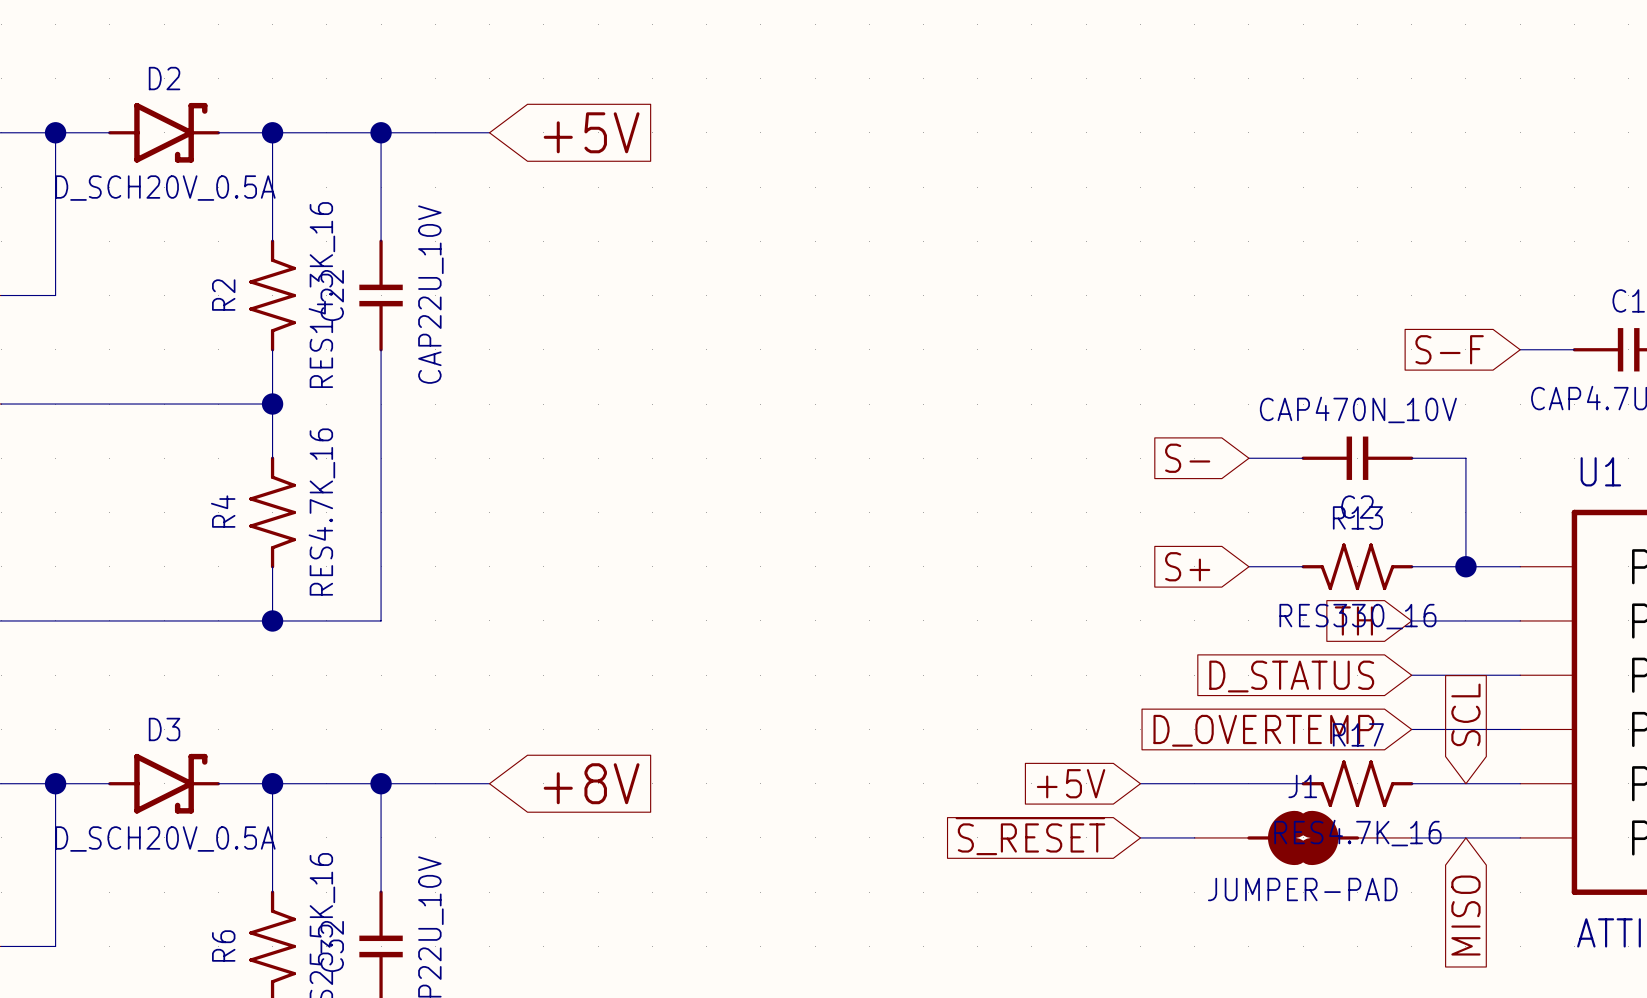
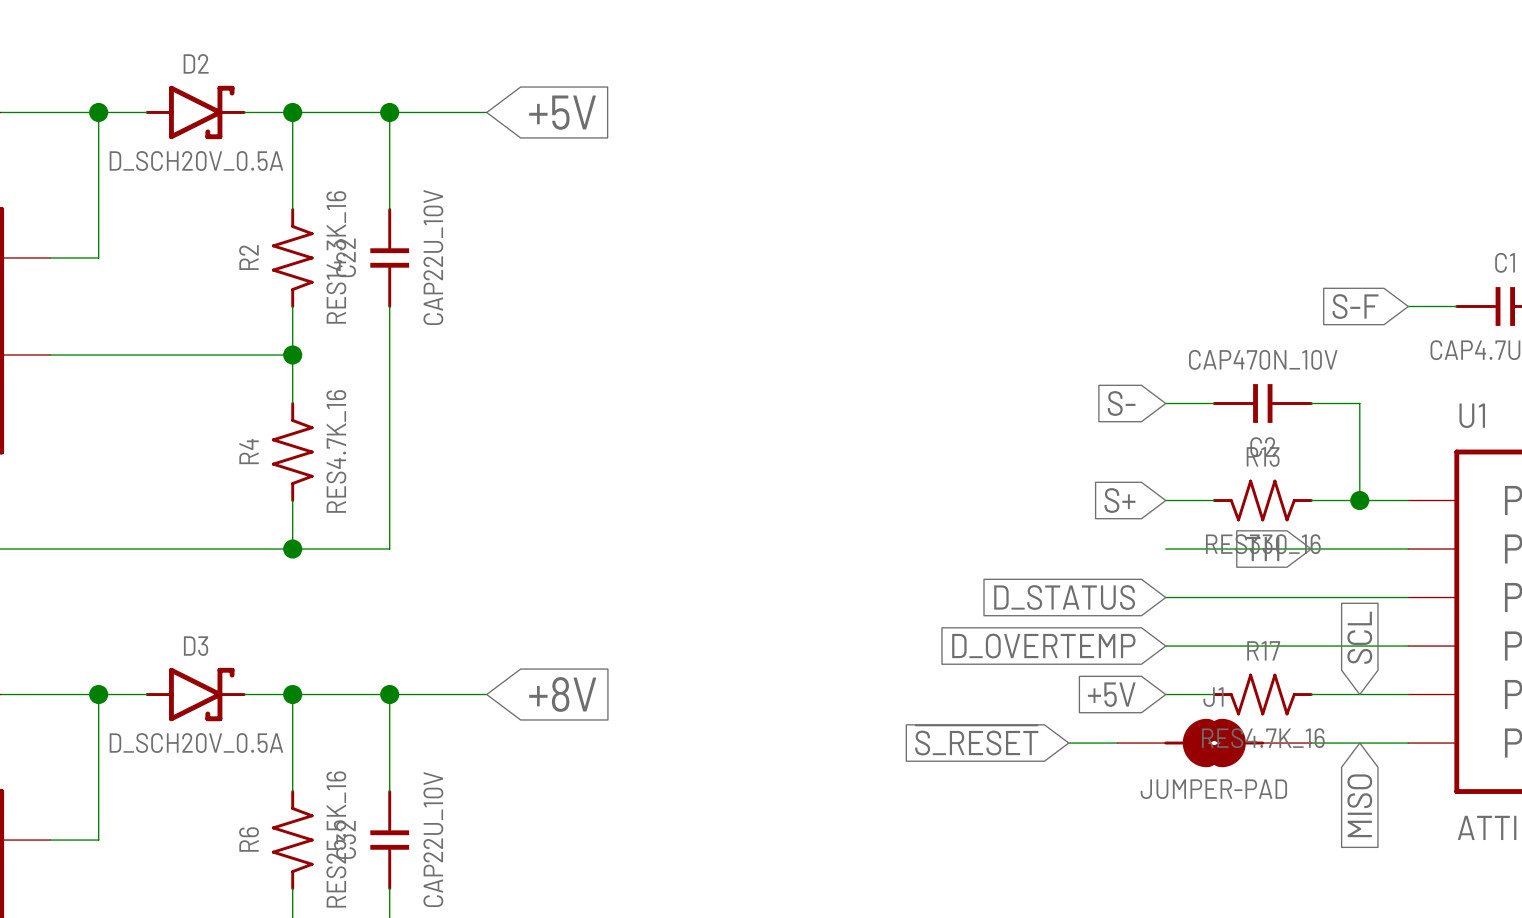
wire: none -> (1165, 549) (1311, 549)
wire: none -> (1165, 597) (1311, 597)
global label position: D_STATUS (1291, 676) -> D_STATUS (1064, 597)
wire: none -> (1165, 646) (1311, 646)
global label position: D_OVERTEMP (1263, 730) -> D_OVERTEMP (1043, 646)
global label position: +5V (1071, 783) -> +5V (1111, 694)
wire: (1140, 783) (1248, 783) -> none

